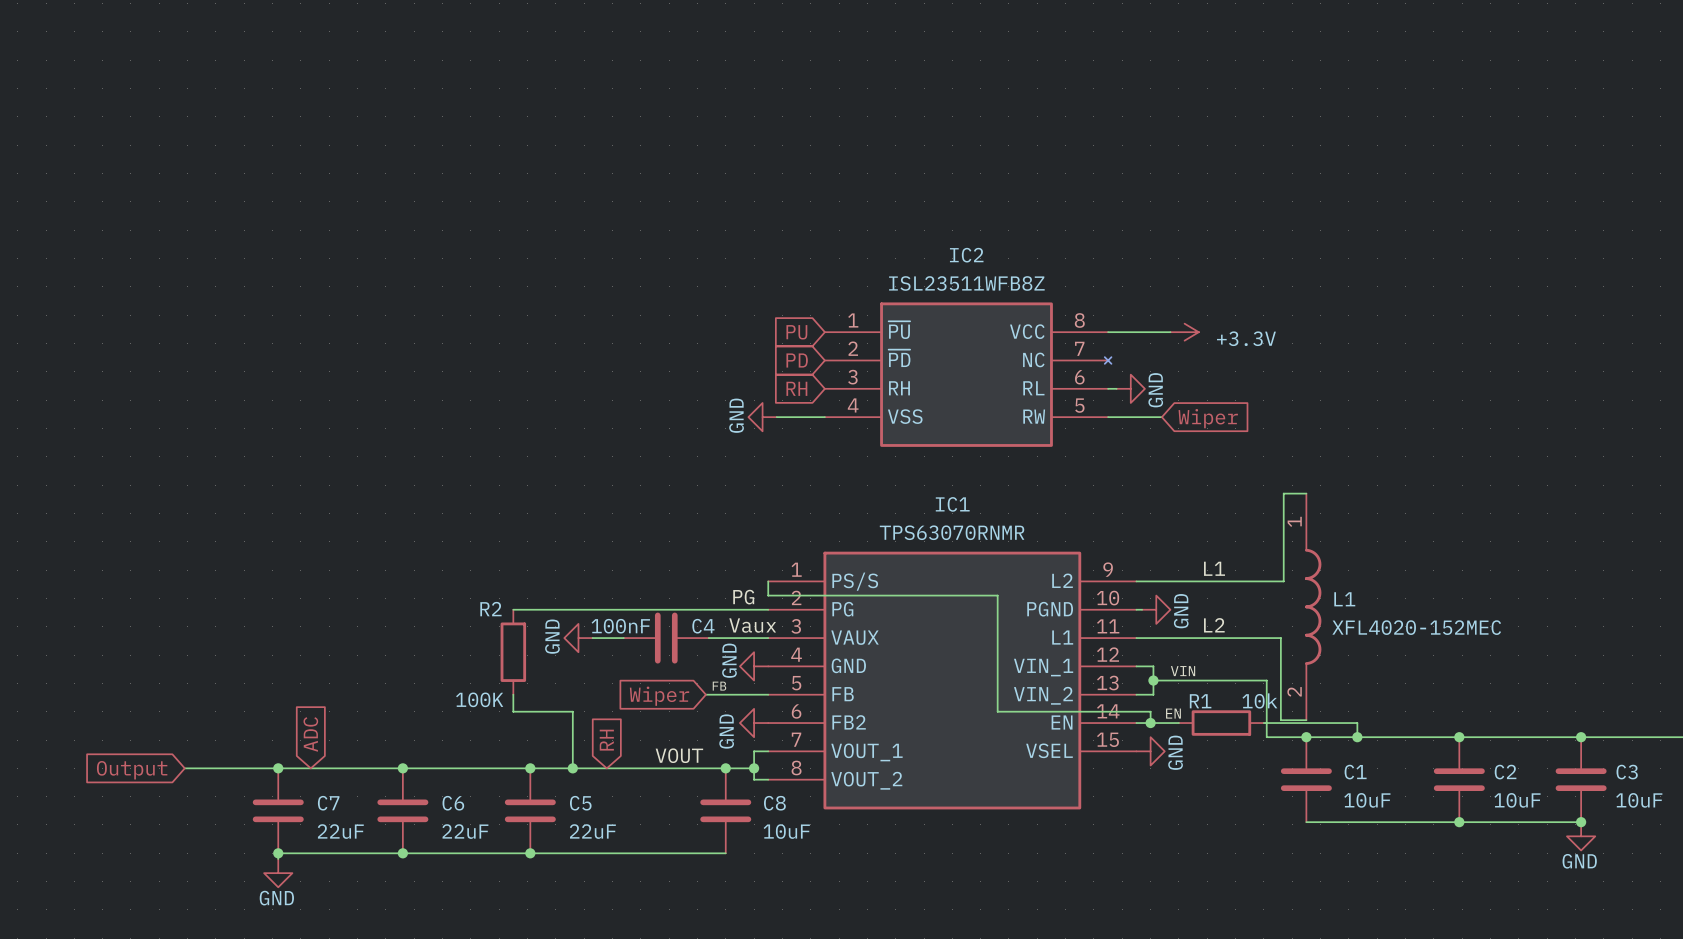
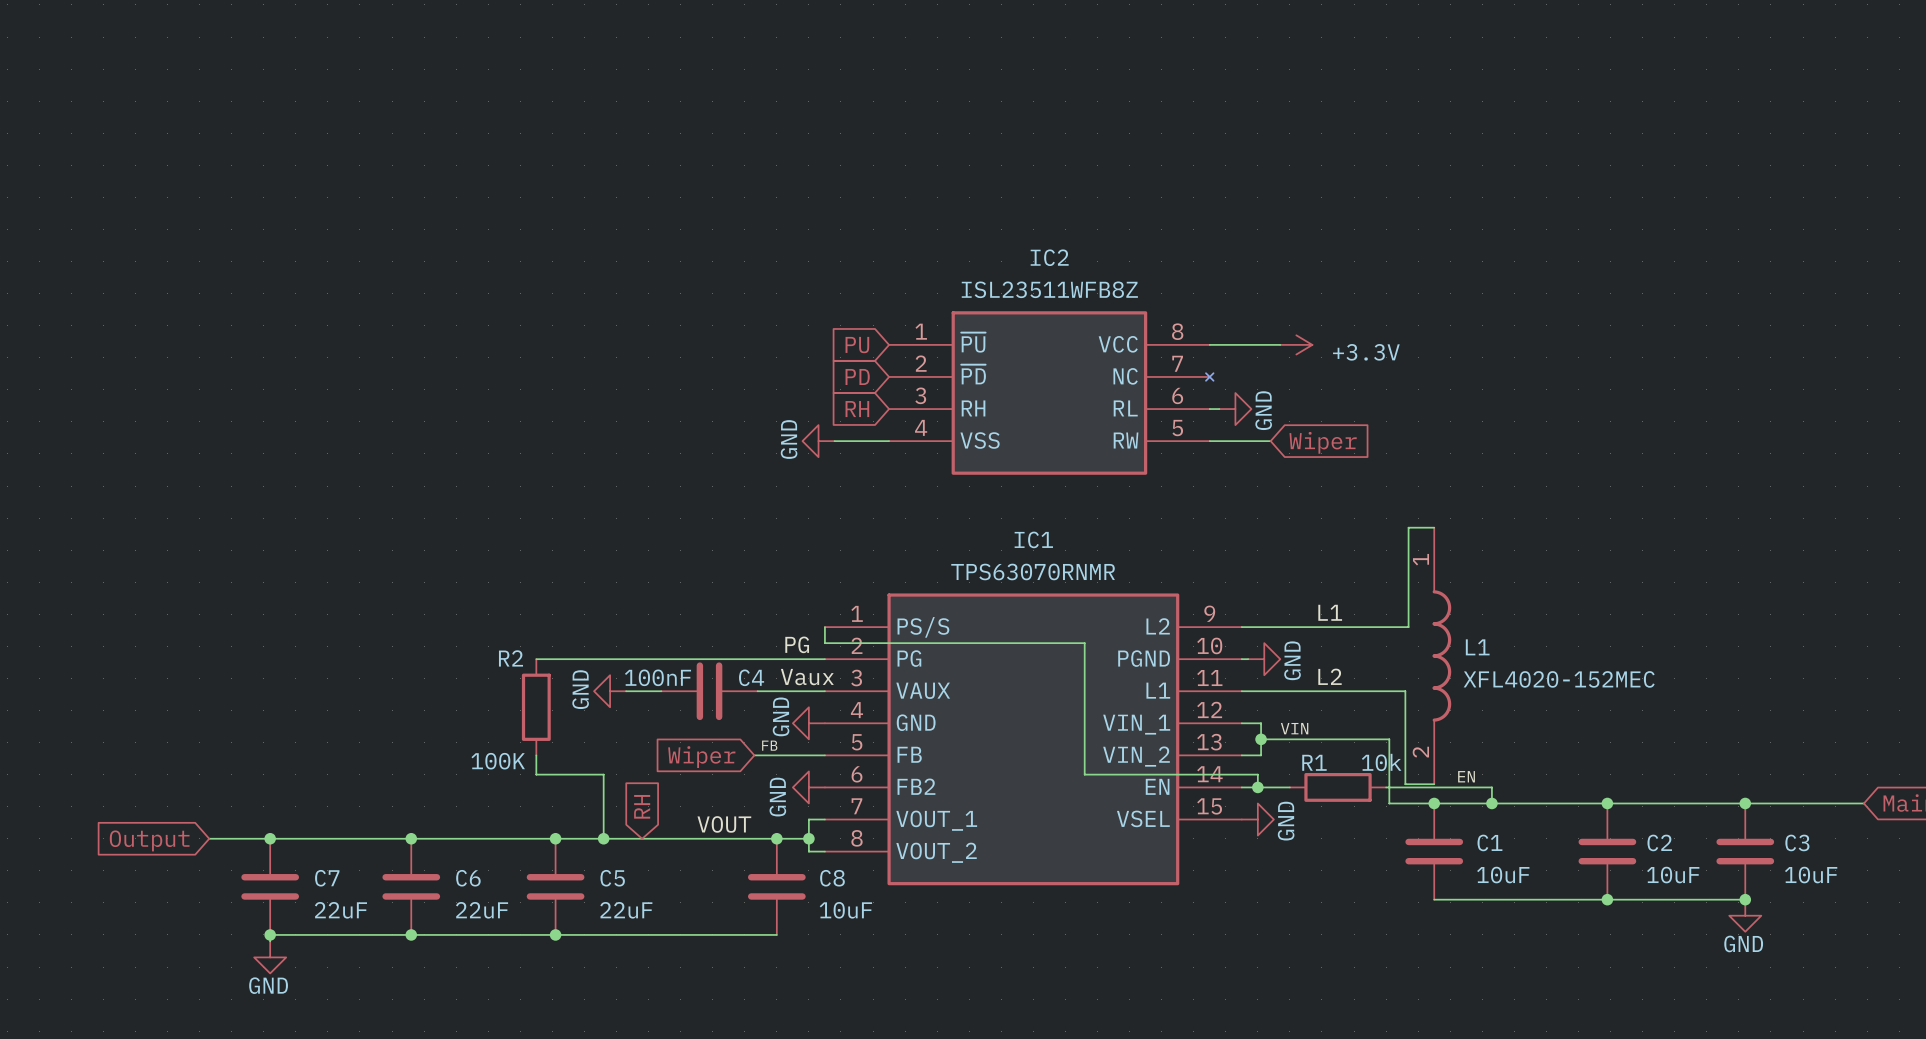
label position: EN (1173, 713) -> EN (1466, 776)
global label: ADC (310, 734) -> none
wire: (184, 768) (224, 768) -> none
global label position: Output (132, 770) -> Output (149, 840)

